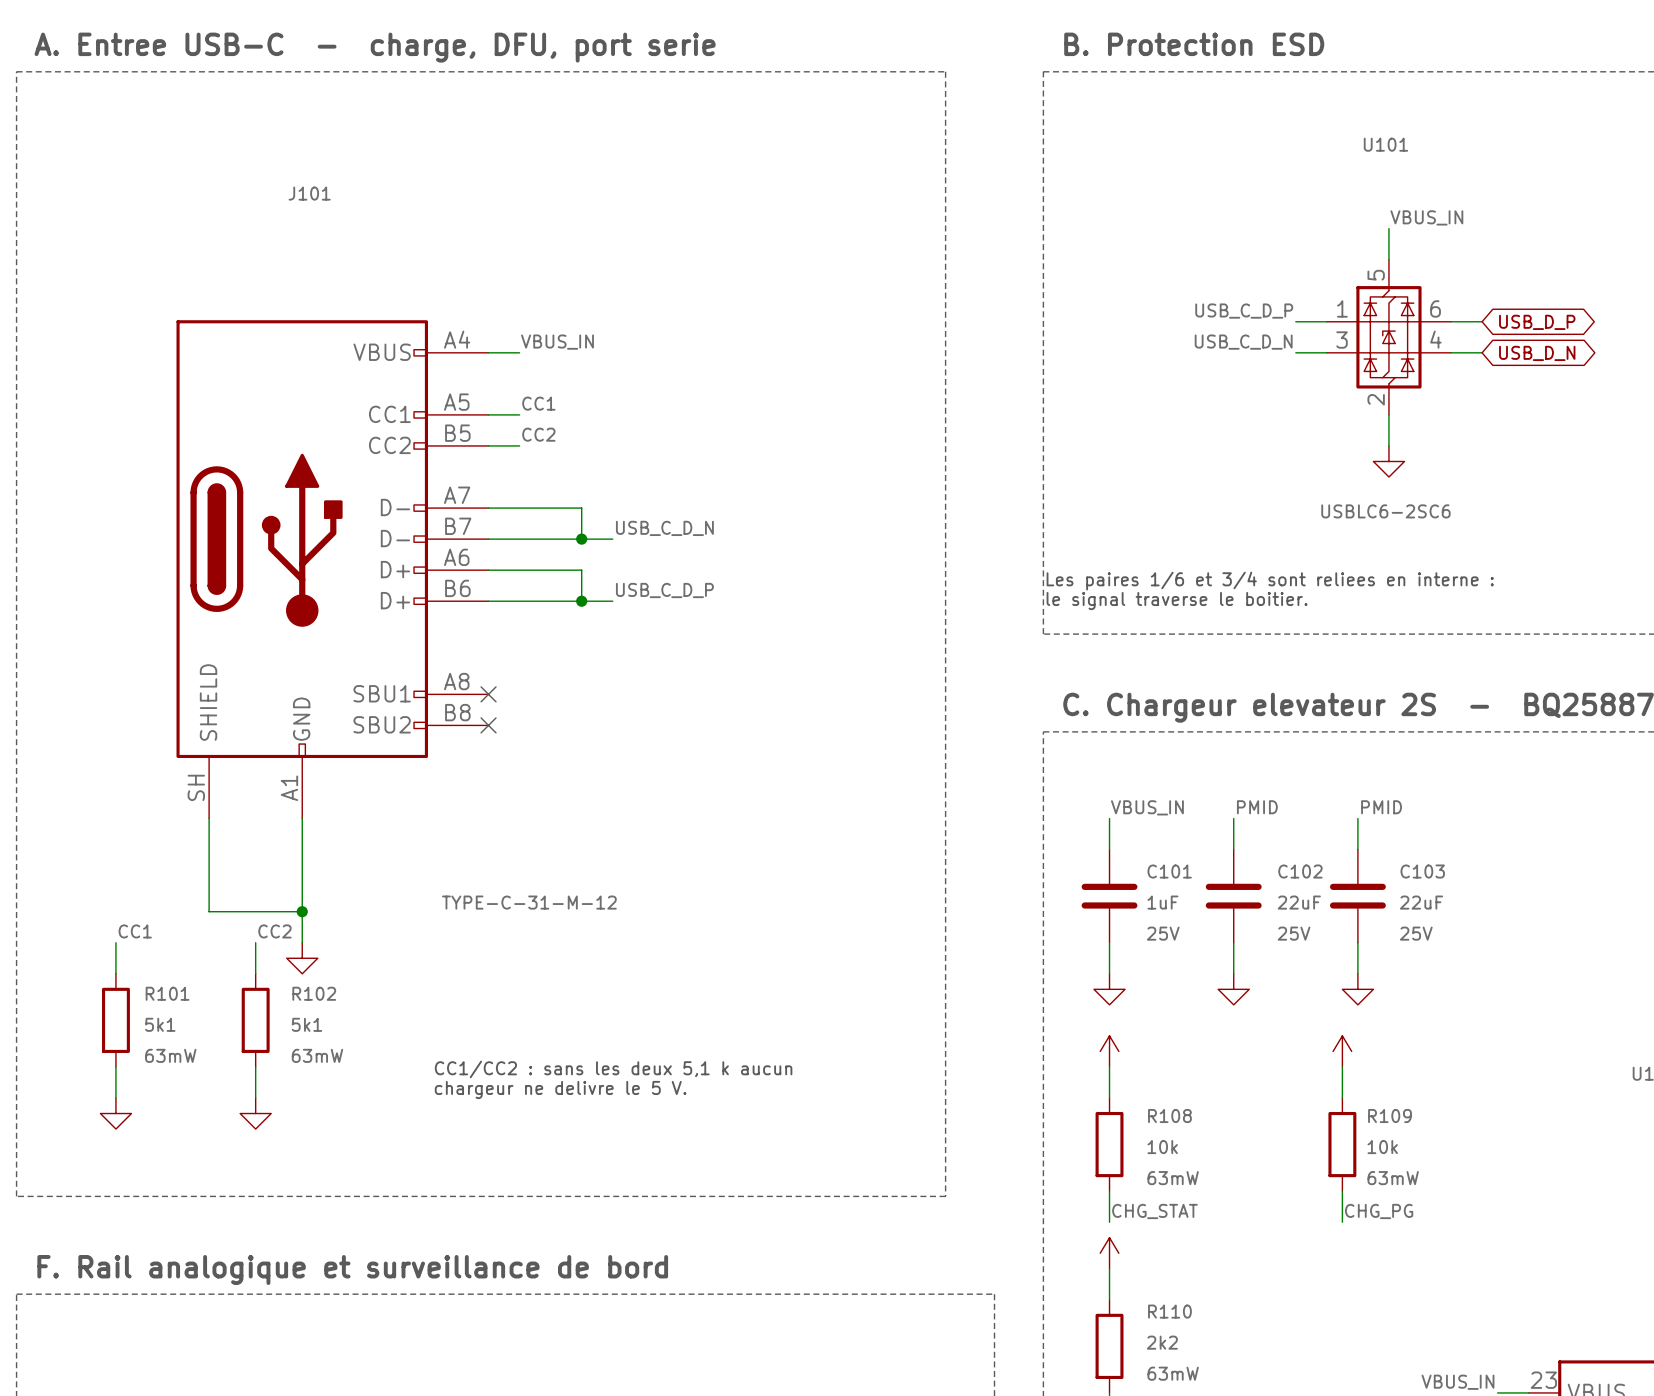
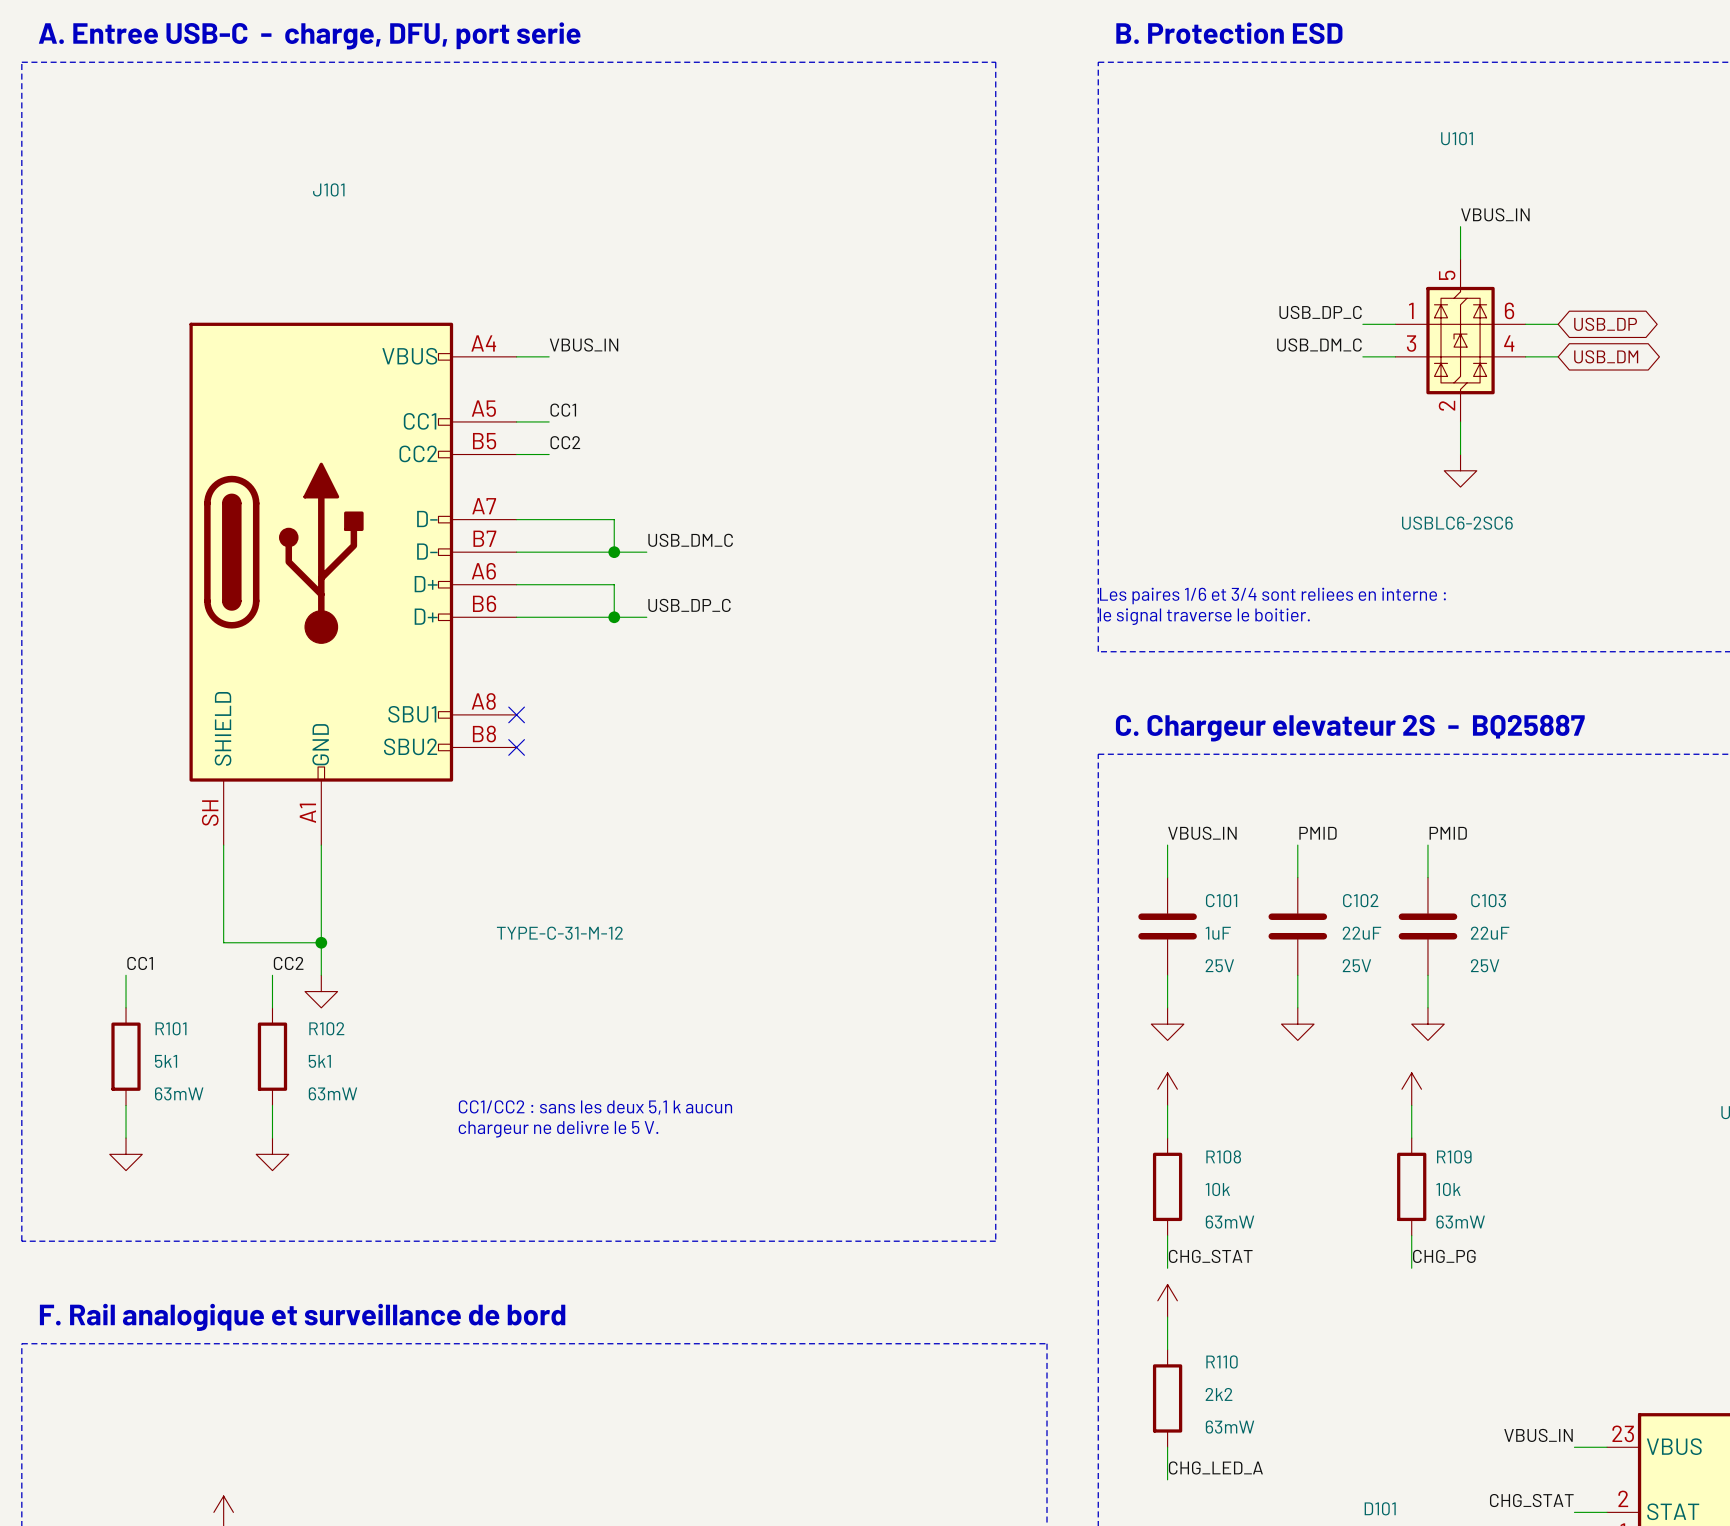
label: USB_C_D_P (1244, 311) -> USB_DP_C (1320, 312)
global label: USB_D_P (1537, 322) -> USB_DP (1605, 324)
label: USB_C_D_N (1243, 342) -> USB_DM_C (1319, 345)
global label: USB_D_N (1537, 353) -> USB_DM (1606, 356)
label: USB_C_D_N (664, 528) -> USB_DM_C (690, 540)
label: USB_C_D_P (664, 590) -> USB_DP_C (689, 605)

